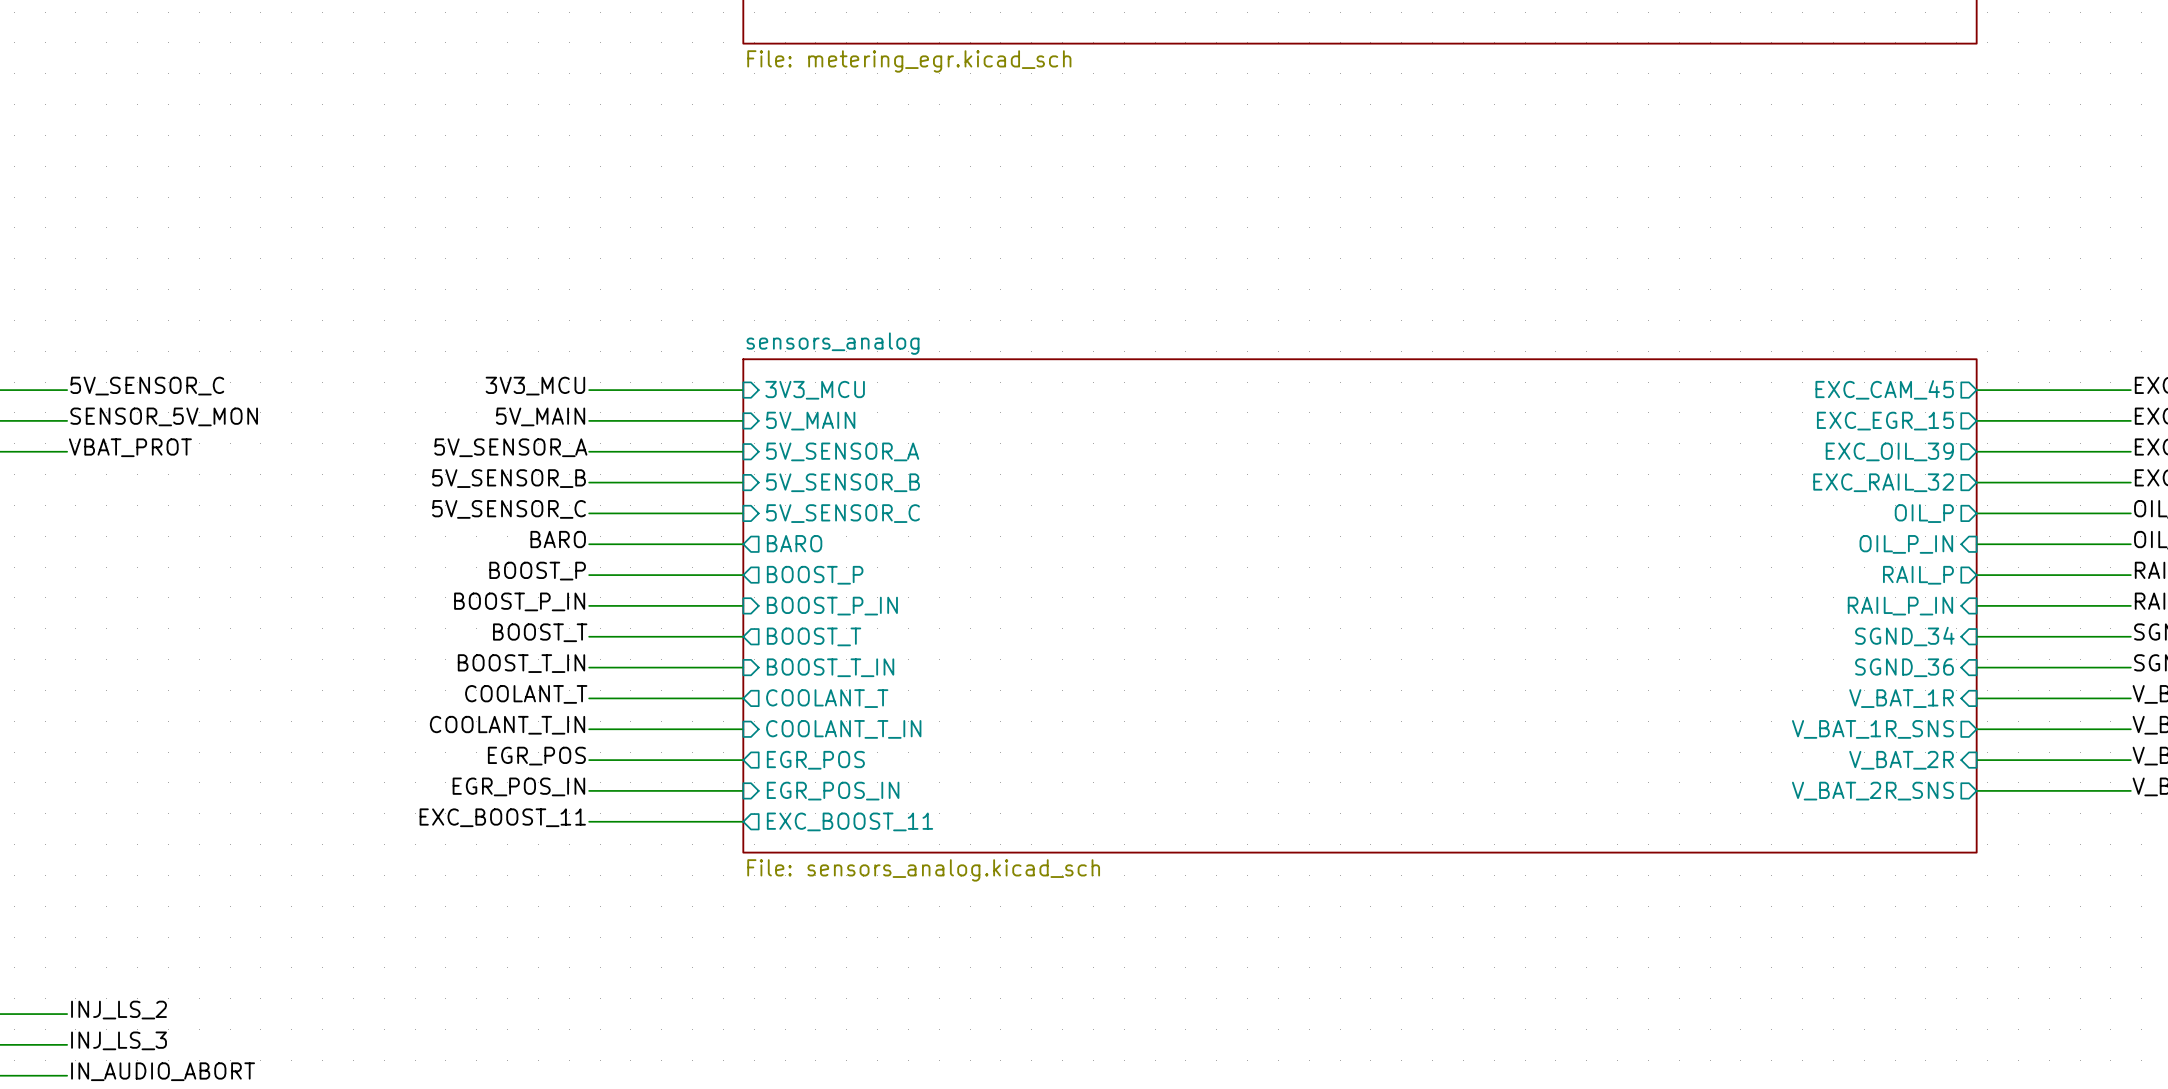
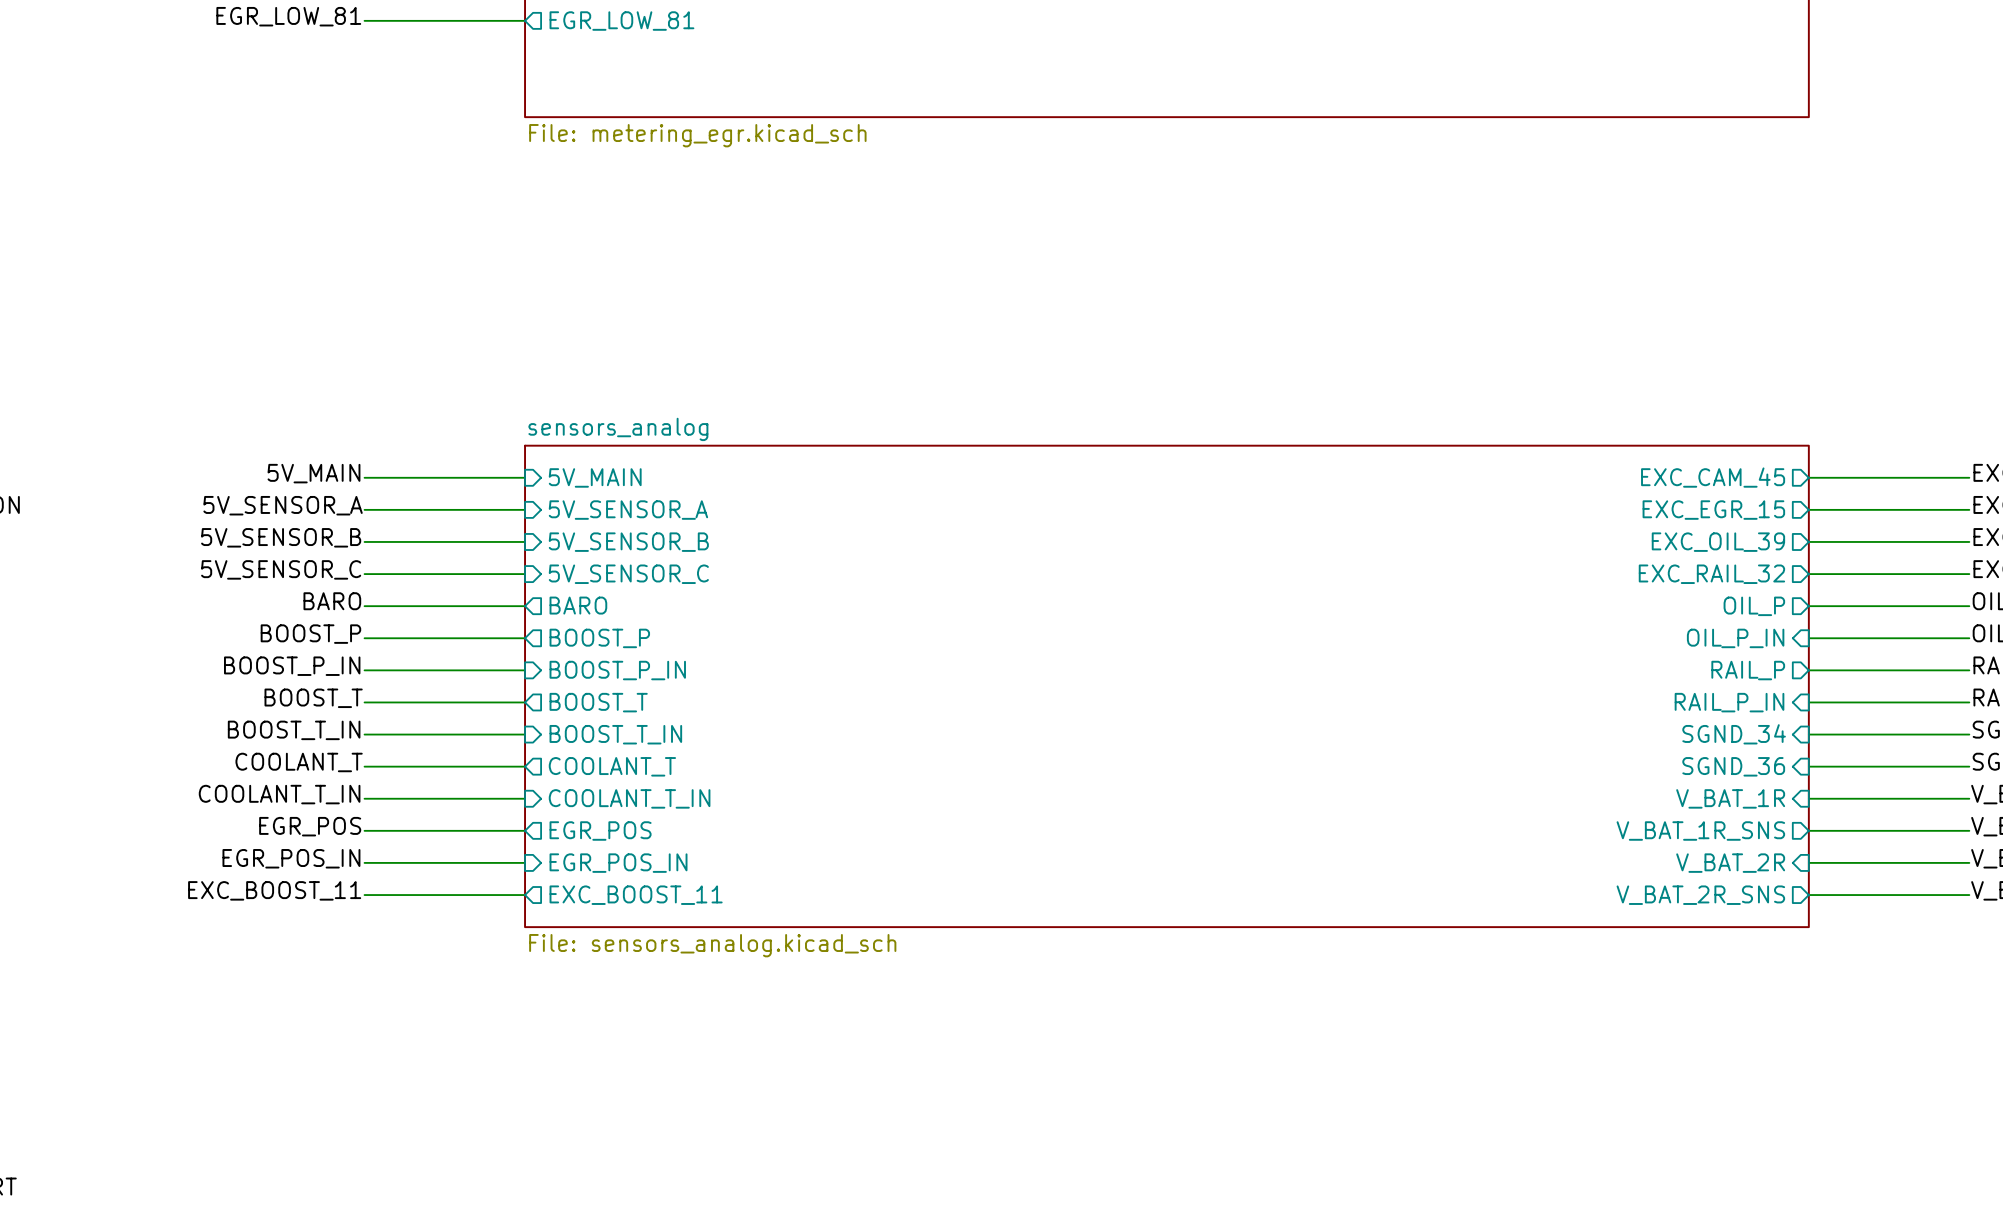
label: 3V3_MCU (535, 386) -> 5V_MAIN (313, 473)
sheet pin: 3V3_MCU (815, 390) -> 5V_MAIN (595, 477)
label: 5V_MAIN (540, 416) -> 5V_SENSOR_A (283, 505)
sheet pin: 5V_MAIN (810, 421) -> 5V_SENSOR_A (628, 510)
label: 5V_SENSOR_A (510, 447) -> 5V_SENSOR_B (281, 537)
sheet pin: 5V_SENSOR_A (842, 451) -> 5V_SENSOR_B (628, 542)
label: 5V_SENSOR_B (508, 478) -> 5V_SENSOR_C (281, 569)
sheet pin: 5V_SENSOR_B (843, 482) -> 5V_SENSOR_C (628, 574)
label: 5V_SENSOR_C (508, 509) -> BARO (332, 601)
sheet pin shape: input (843, 513) -> output (578, 605)
sheet pin: 5V_SENSOR_C (843, 513) -> BARO (578, 605)
label: BARO (558, 539) -> BOOST_P (310, 634)
sheet pin: BARO (794, 543) -> BOOST_P (599, 638)
label: BOOST_P (537, 571) -> BOOST_P_IN (292, 666)
sheet pin shape: output (815, 575) -> input (617, 670)
sheet pin: BOOST_P (815, 575) -> BOOST_P_IN (617, 670)
sheet sensors_analog: none -> File: sensors_analog.kicad_sch (1166, 686)
label: BOOST_P_IN (519, 601) -> BOOST_T (313, 698)
sheet sensors_analog: File: sensors_analog.kicad_sch (1359, 605) -> none
sheet pin shape: input (832, 606) -> output (598, 702)
sheet pin: BOOST_P_IN (832, 606) -> BOOST_T (598, 702)
label: BOOST_T (540, 632) -> BOOST_T_IN (294, 730)
sheet pin shape: output (814, 636) -> input (615, 734)
sheet pin: BOOST_T (814, 636) -> BOOST_T_IN (615, 734)
label: BOOST_T_IN (521, 663) -> COOLANT_T (299, 762)
sheet pin shape: input (830, 667) -> output (612, 766)
sheet pin: BOOST_T_IN (830, 667) -> COOLANT_T (612, 766)
label: COOLANT_T (526, 694) -> COOLANT_T_IN (279, 794)
sheet pin shape: output (827, 698) -> input (629, 798)
sheet pin: COOLANT_T (827, 698) -> COOLANT_T_IN (629, 798)
label: COOLANT_T_IN (507, 725) -> EGR_POS (310, 826)
sheet pin shape: input (843, 729) -> output (600, 831)
sheet pin: COOLANT_T_IN (843, 729) -> EGR_POS (600, 831)
label: EGR_POS (536, 756) -> EGR_POS_IN (291, 858)
sheet pin shape: output (815, 760) -> input (618, 863)
sheet pin: EGR_POS (815, 760) -> EGR_POS_IN (618, 863)
label: EGR_POS_IN (518, 786) -> EXC_BOOST_11 (274, 890)
sheet pin shape: input (833, 791) -> output (636, 895)
sheet pin: EGR_POS_IN (833, 791) -> EXC_BOOST_11 (636, 895)
label: EXC_BOOST_11 (502, 817) -> none
wire: (589, 821) (743, 821) -> none
sheet pin: EXC_BOOST_11 (850, 821) -> none

